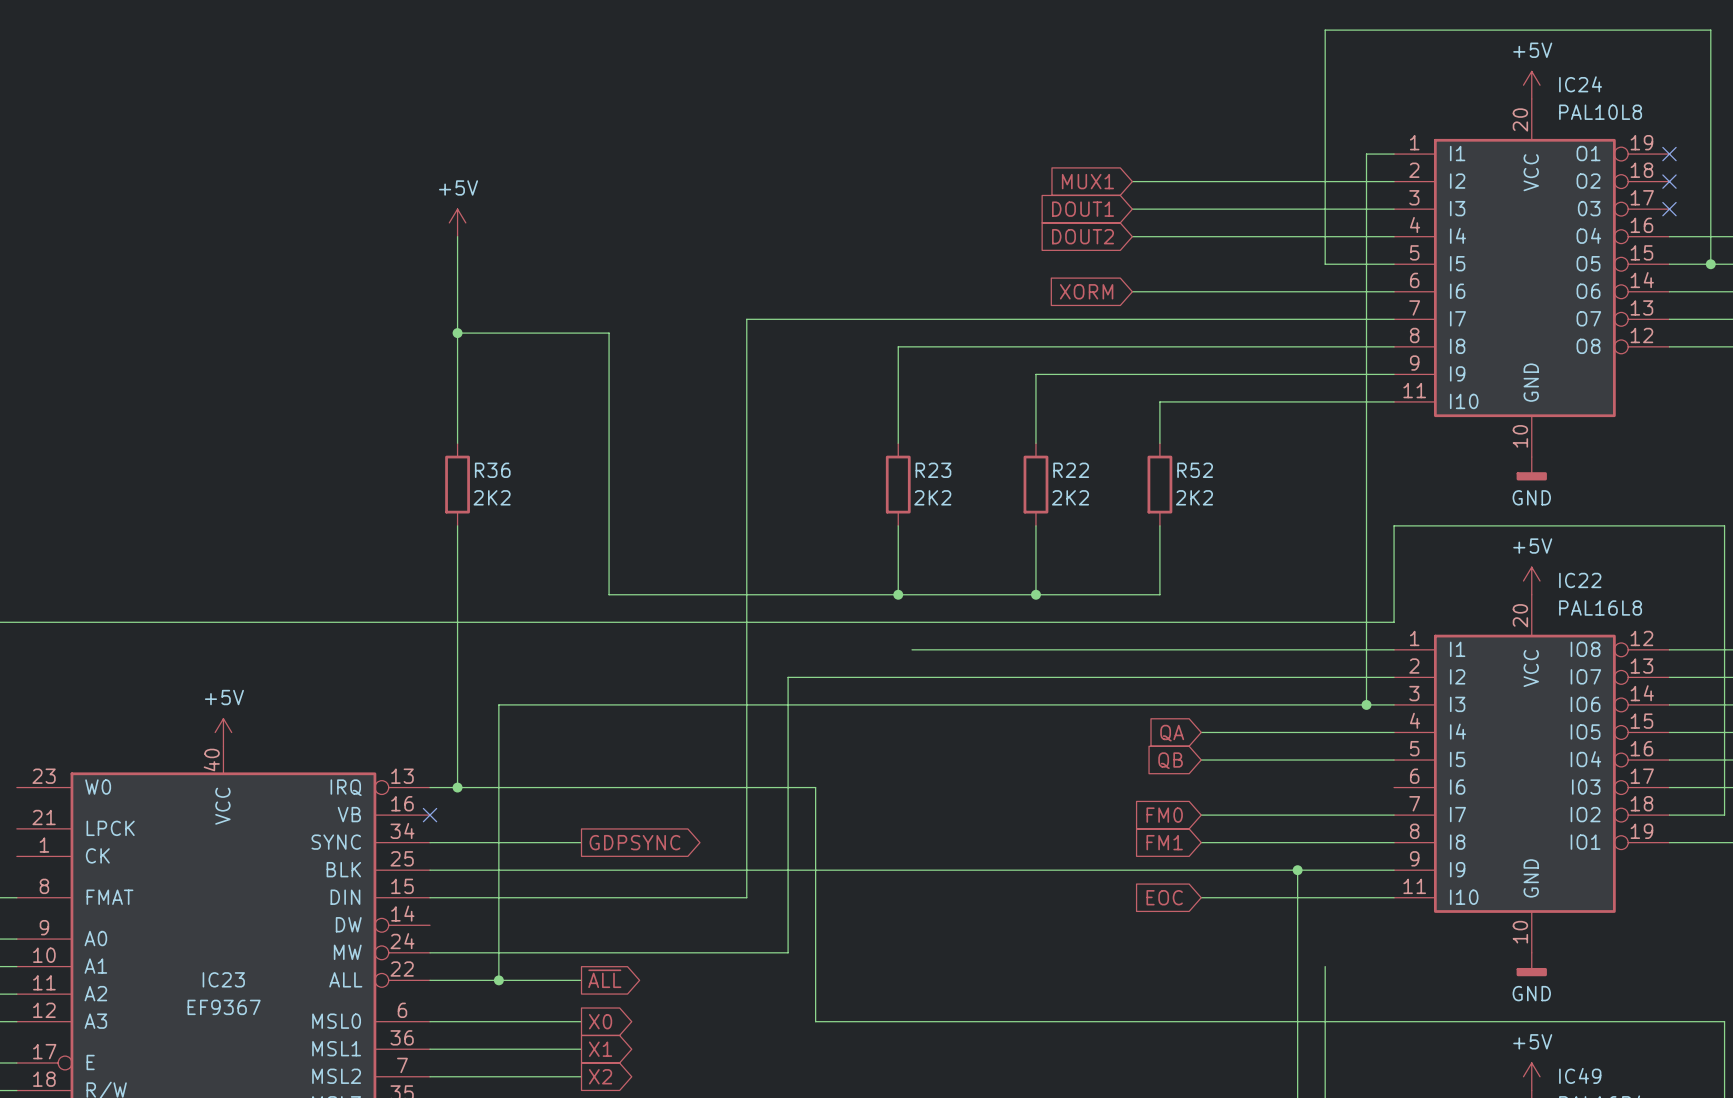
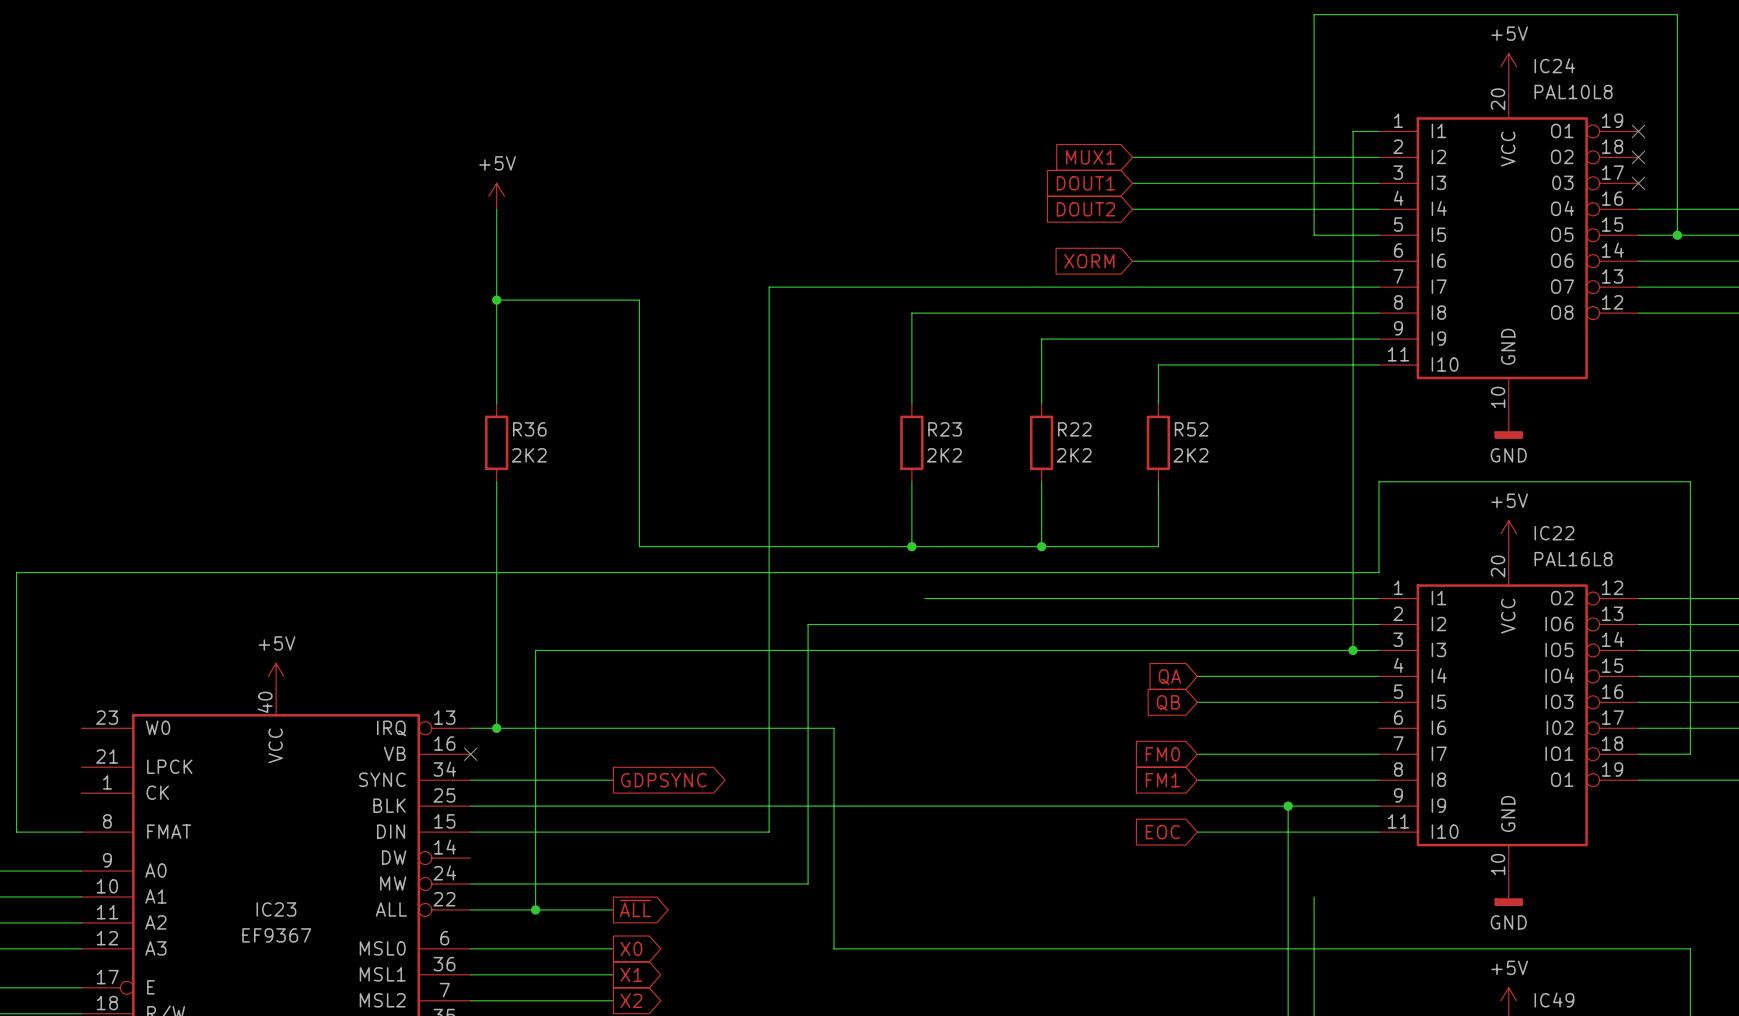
IC22 pin name: IO8 (1585, 649) -> O2 (1562, 598)
IC22 pin name: IO7 (1585, 676) -> IO6 (1559, 624)
IC22 pin name: IO6 (1585, 704) -> IO5 (1559, 649)
IC22 pin name: IO5 (1585, 731) -> IO4 (1559, 675)
IC22 pin name: IO4 (1585, 759) -> IO3 (1559, 701)
IC22 pin name: I03 (1586, 787) -> I02 (1560, 727)
IC22 pin name: IO2 (1585, 814) -> IO1 (1559, 753)
IC22 pin name: IO1 (1585, 842) -> O1 (1562, 779)

